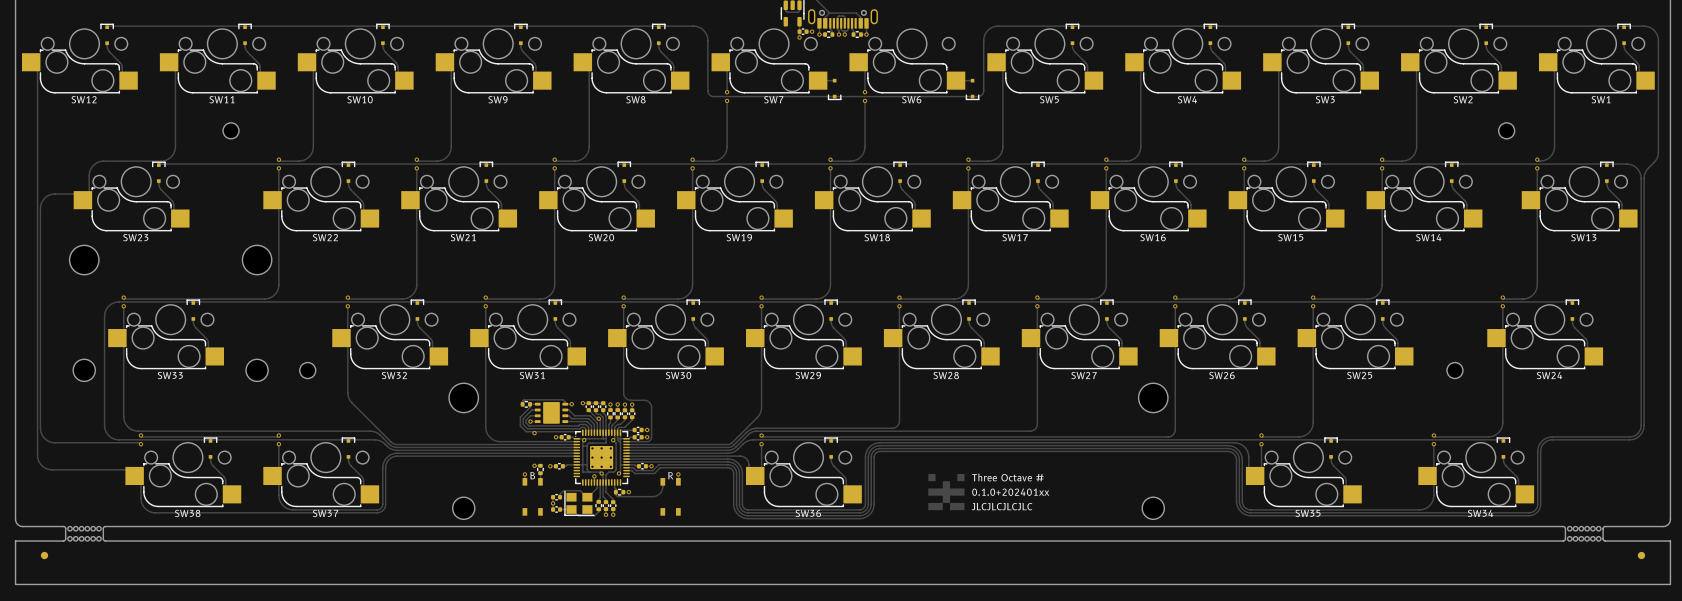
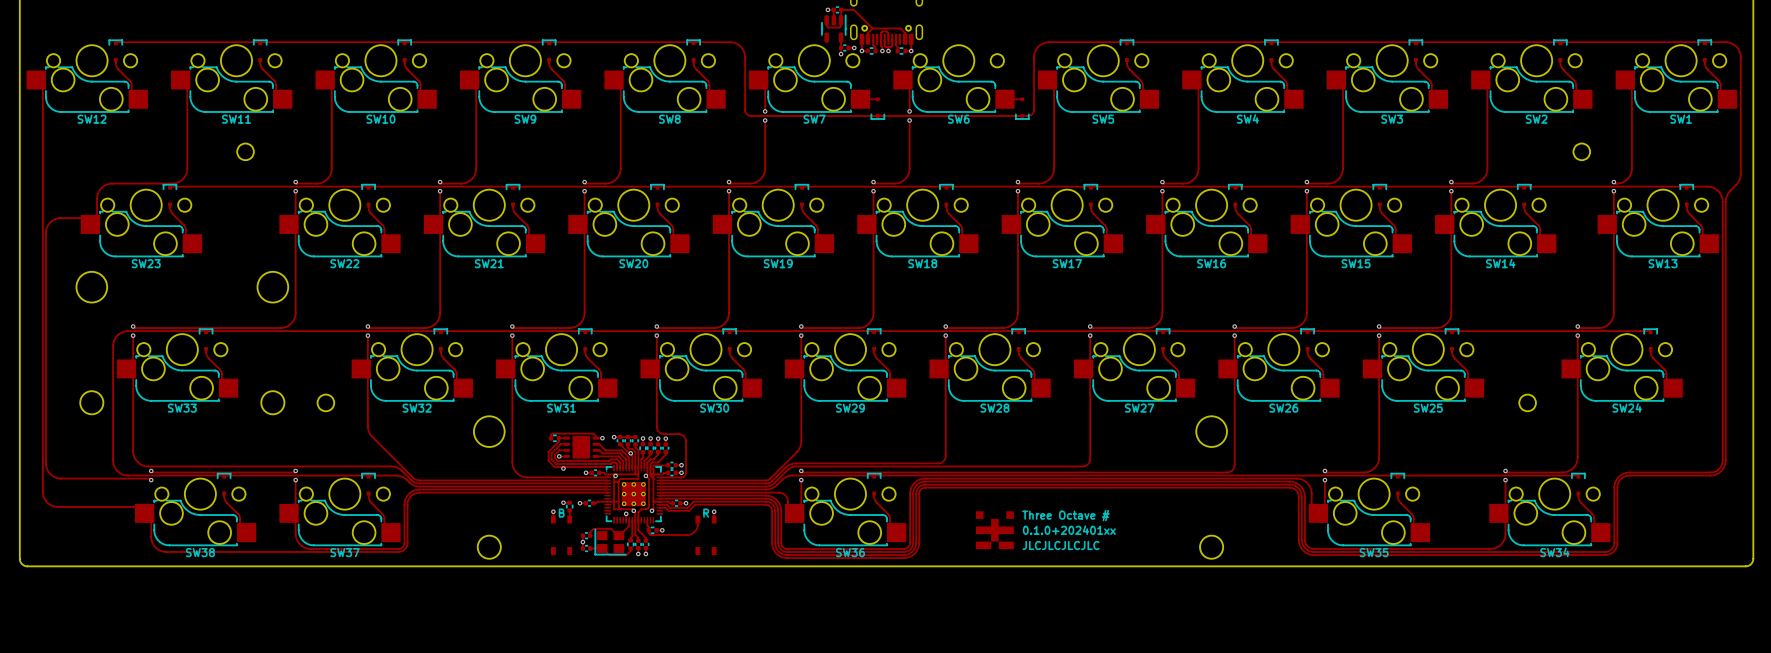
board edge: (63, 526) (65, 528) (64, 540) (15, 541) (15, 584) (1670, 584) (1670, 541) (1604, 540) (1603, 528) (1605, 526) -> (70, 566) (114, 566)
round board edge: [67, 526, 73, 532] -> none
round board edge: [73, 526, 79, 532] -> none
round board edge: [79, 526, 85, 532] -> none
round board edge: [84, 526, 90, 532] -> none
round board edge: [90, 526, 96, 532] -> none
round board edge: [96, 526, 102, 532] -> none
board edge: (105, 526) (103, 528) (103, 539) (105, 541) (1563, 541) (1565, 538) (1565, 528) (1563, 526) -> (1685, 566) (1641, 566)
round board edge: [1567, 526, 1573, 532] -> none
round board edge: [1573, 526, 1579, 532] -> none
round board edge: [1578, 526, 1584, 532] -> none
round board edge: [1584, 526, 1590, 532] -> none
round board edge: [1590, 526, 1596, 532] -> none
round board edge: [1596, 526, 1602, 532] -> none
round board edge: [67, 536, 73, 542] -> none
round board edge: [73, 536, 79, 542] -> none
round board edge: [79, 536, 85, 542] -> none
round board edge: [84, 536, 90, 542] -> none
round board edge: [90, 536, 96, 542] -> none
round board edge: [96, 536, 102, 542] -> none
round board edge: [1567, 536, 1573, 542] -> none
round board edge: [1573, 536, 1579, 542] -> none
round board edge: [1578, 536, 1584, 542] -> none
round board edge: [1584, 536, 1590, 542] -> none
round board edge: [1590, 536, 1596, 542] -> none
round board edge: [1596, 536, 1602, 542] -> none
part: (44, 555) -> none
part: (1641, 555) -> none

